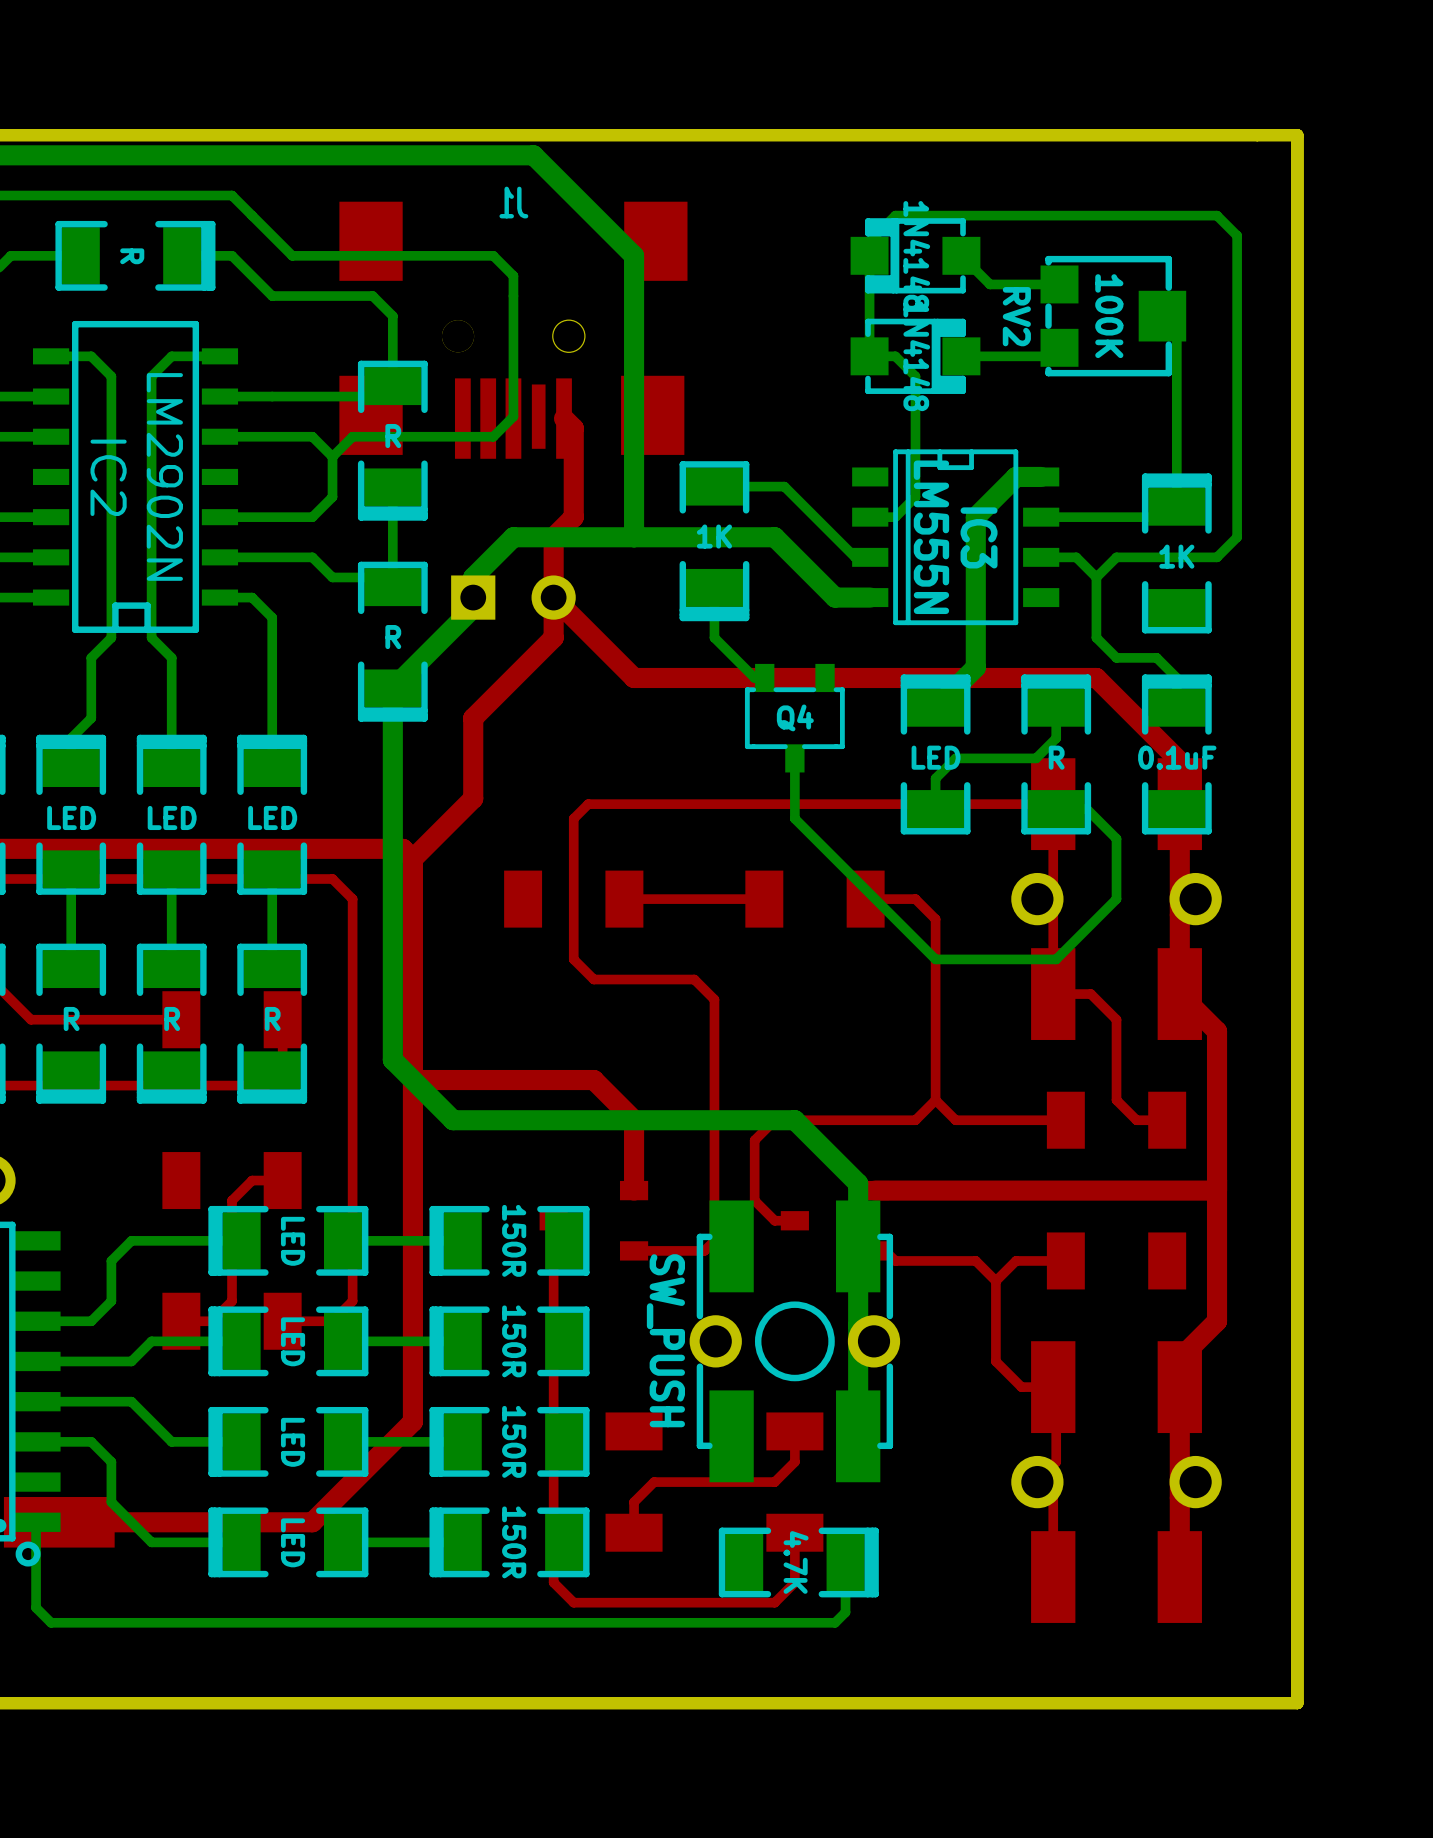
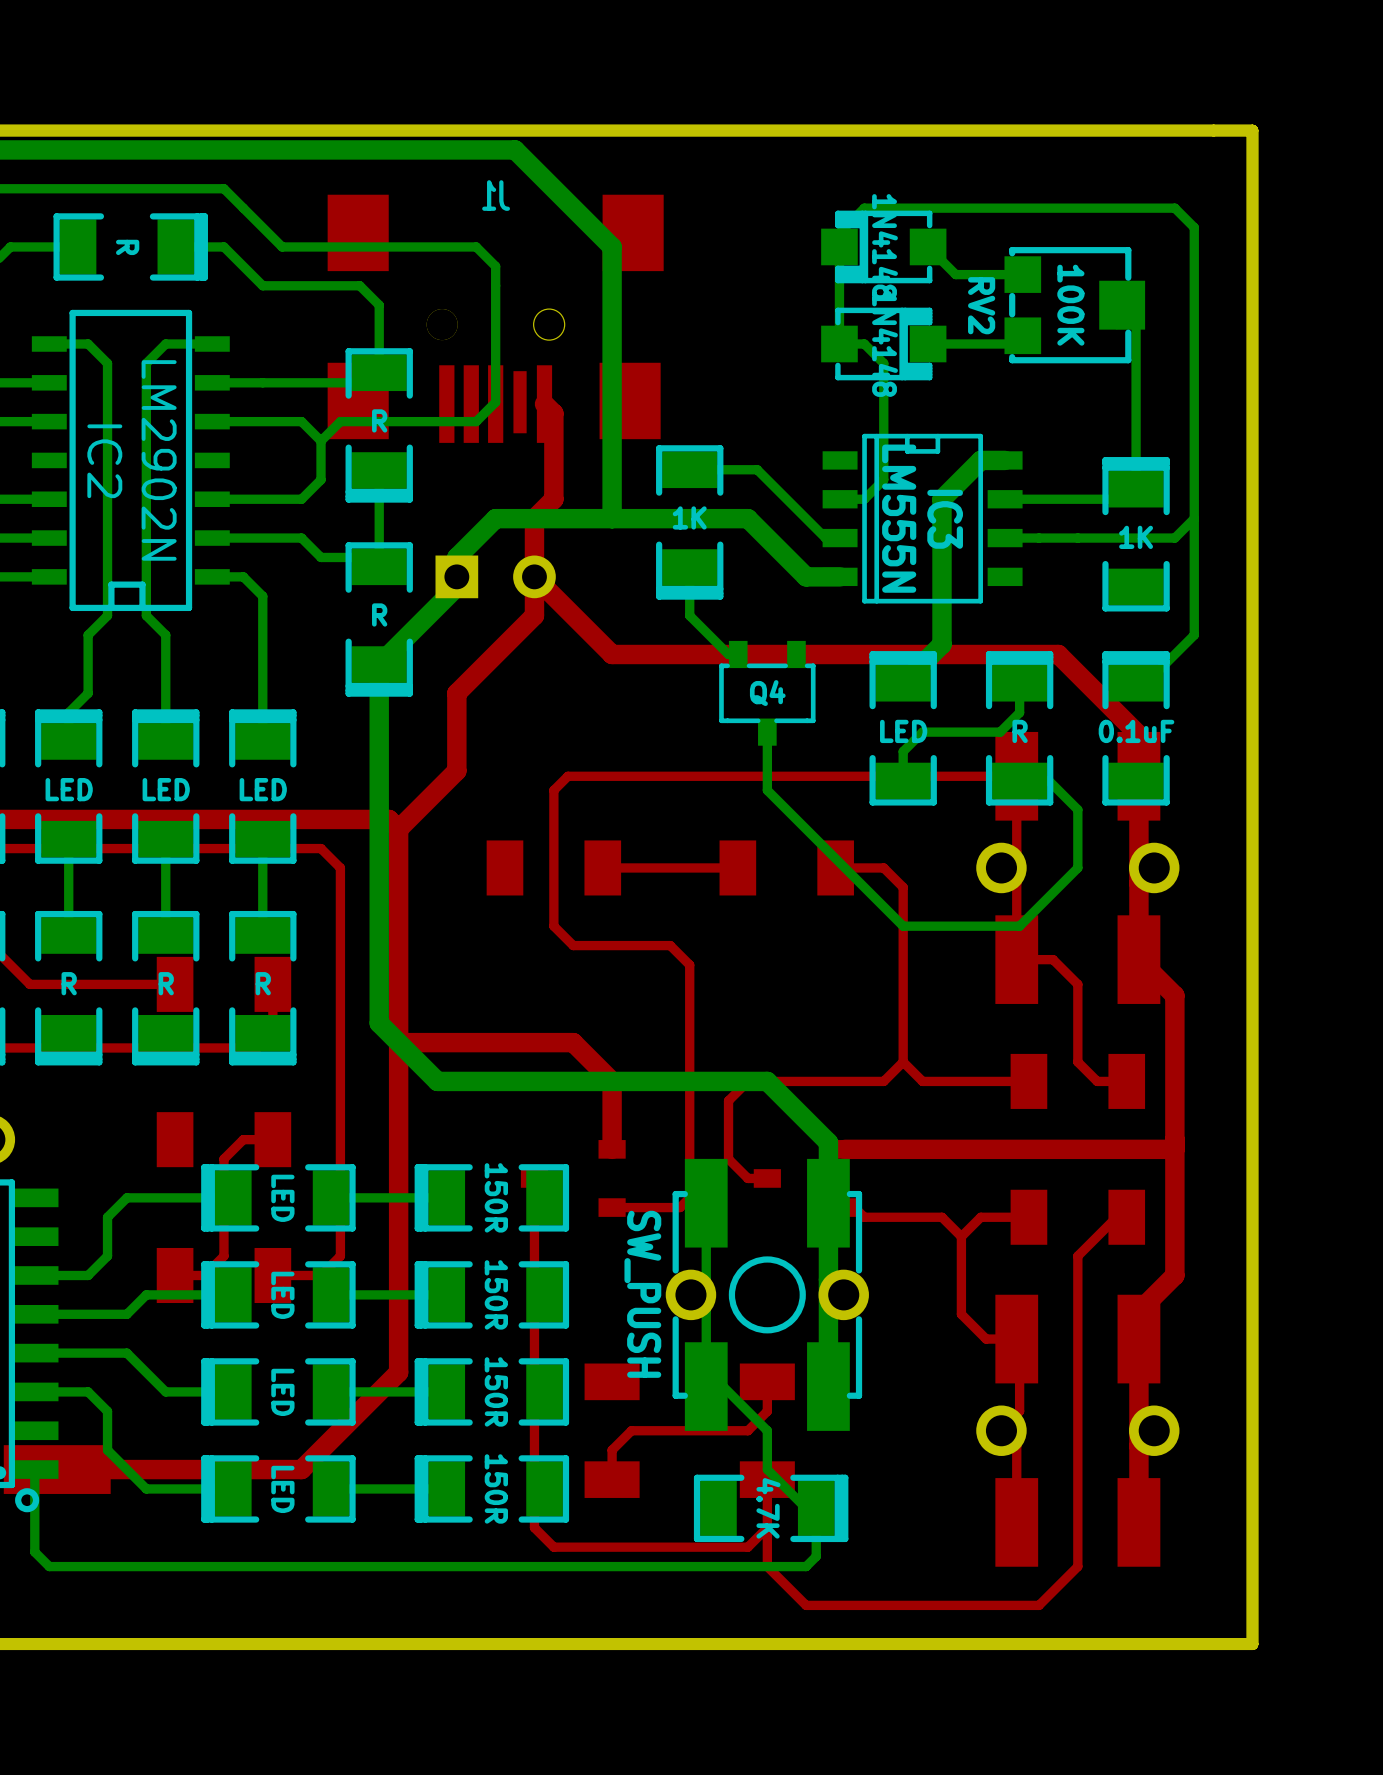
bottom track: (1076, 557) (1096, 577) -> none
bottom track: (1116, 557) (1096, 577) -> (1077, 538) (1039, 538)
bottom track: (1096, 577) (1096, 637) (1116, 657) (1156, 657) (1176, 677) (1176, 707) -> (1194, 518) (1194, 635) (1146, 683) (1136, 683)
bottom track: none -> (706, 1203) (706, 1279) (690, 1294) (706, 1311) (706, 1386) (723, 1386) (767, 1430) (767, 1469) (806, 1508) (816, 1508)
top track: none -> (1126, 1217) (1116, 1217) (1077, 1256) (1077, 1566) (1039, 1605) (806, 1605) (767, 1566) (767, 1527)

